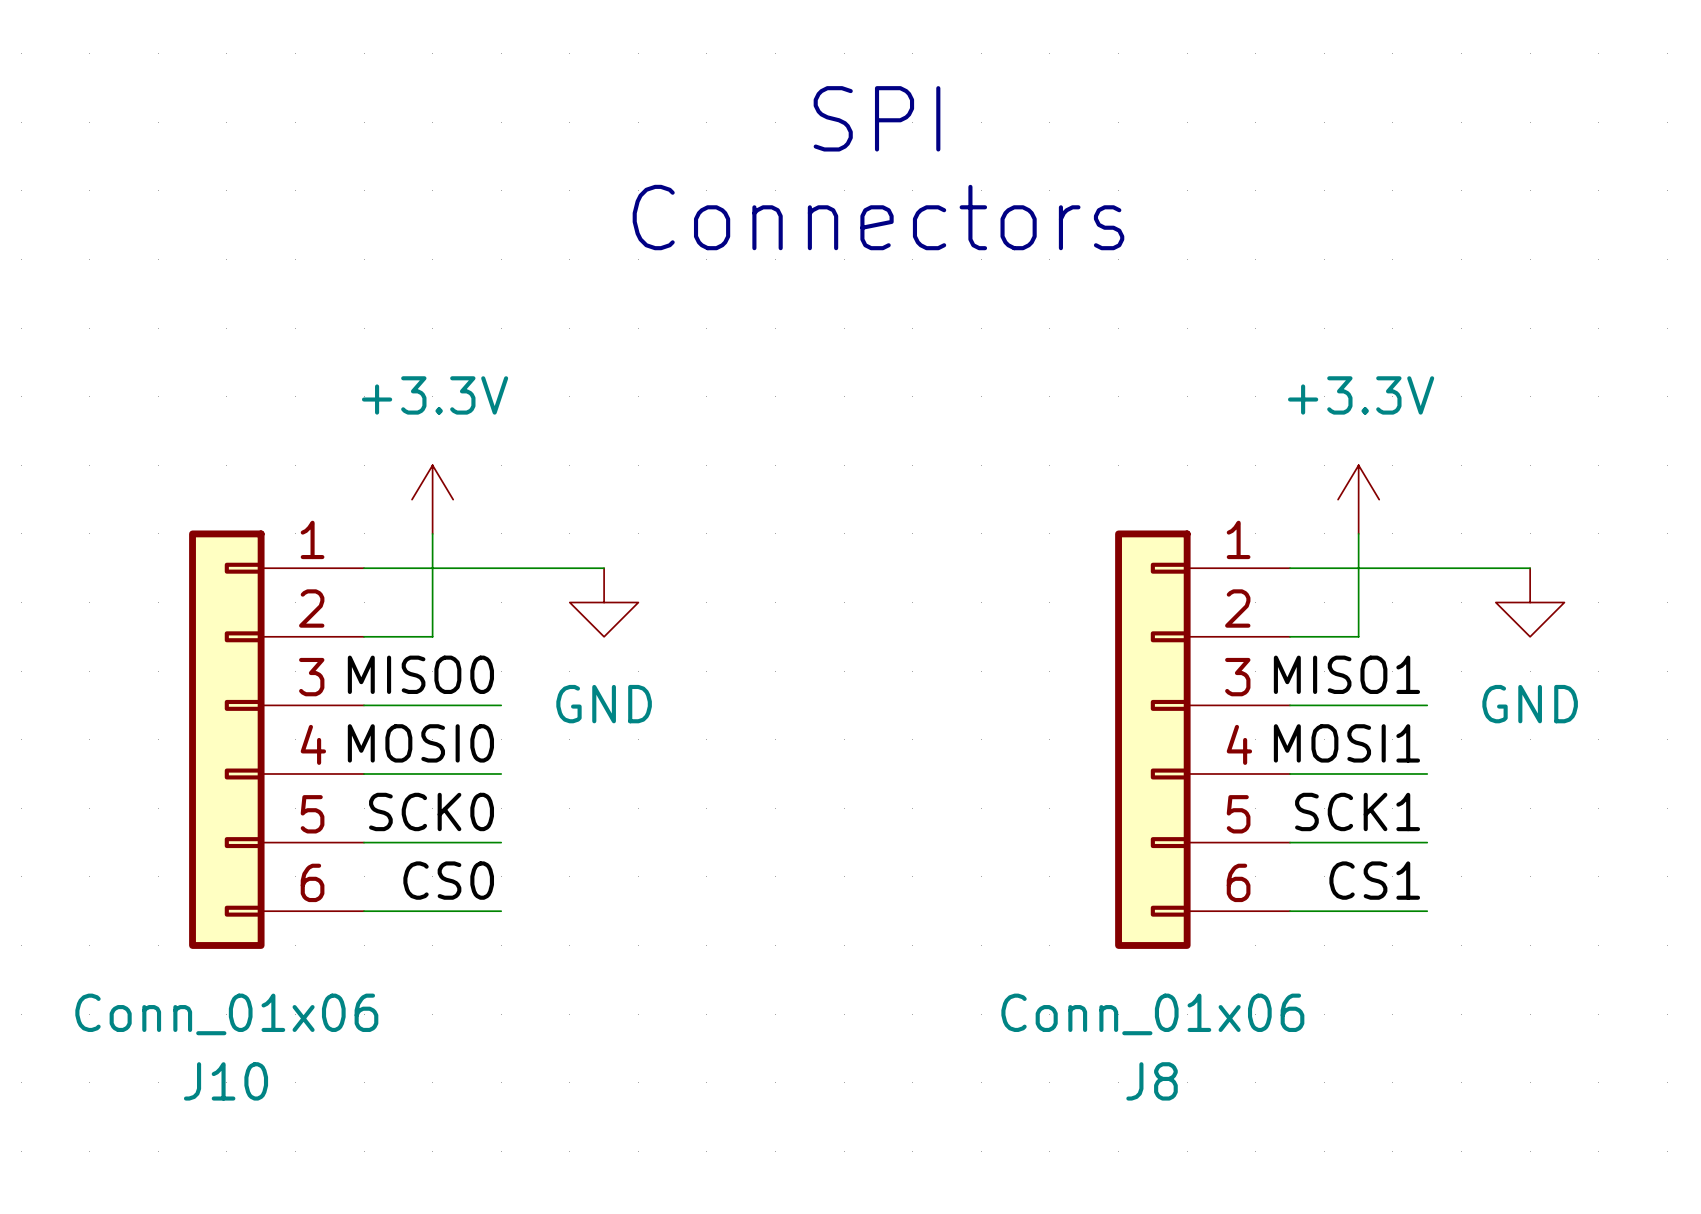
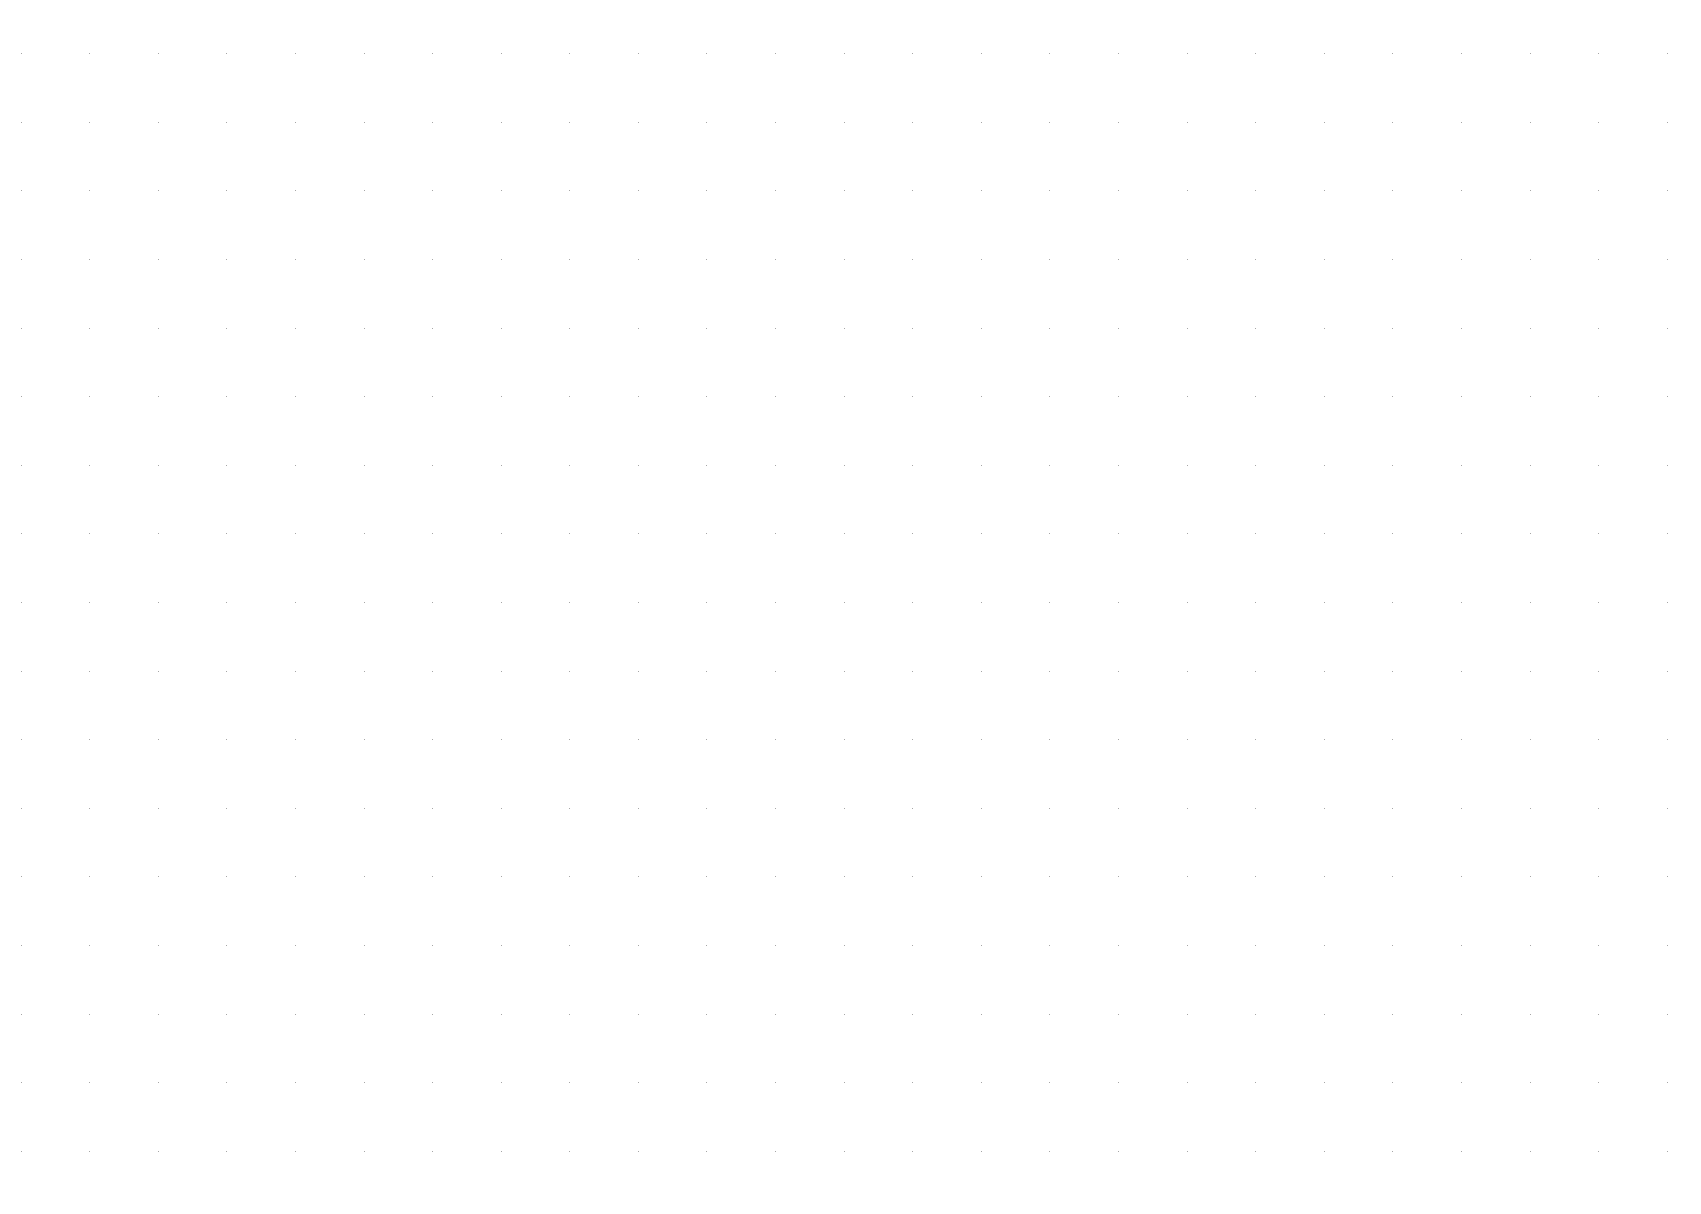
text: SPI (877, 118) -> none
text: Connectors (878, 217) -> none
power symbol: +3.3V (432, 499) -> none
power symbol: +3.3V (1358, 499) -> none
wire: (432, 533) (432, 636) (364, 636) -> none
wire: (1358, 533) (1358, 636) (1290, 636) -> none
wire: (364, 568) (604, 568) -> none
wire: (1290, 568) (1530, 568) -> none
power symbol: GND (604, 602) -> none
power symbol: GND (1530, 602) -> none
label: MISO0 (420, 674) -> none
label: MISO1 (1346, 674) -> none
wire: (364, 705) (501, 705) -> none
wire: (1290, 705) (1427, 705) -> none
J10: Conn_01x06 (276, 739) -> none
J8: Conn_01x06 (1202, 739) -> none
label: MOSI0 (420, 743) -> none
label: MOSI1 (1346, 743) -> none
wire: (364, 773) (501, 773) -> none
wire: (1290, 773) (1427, 773) -> none
label: SCK0 (431, 811) -> none
label: SCK1 (1357, 811) -> none
wire: (364, 842) (501, 842) -> none
wire: (1290, 842) (1427, 842) -> none
label: CS0 (448, 880) -> none
label: CS1 (1374, 880) -> none
wire: (364, 911) (501, 911) -> none
wire: (1290, 911) (1427, 911) -> none

